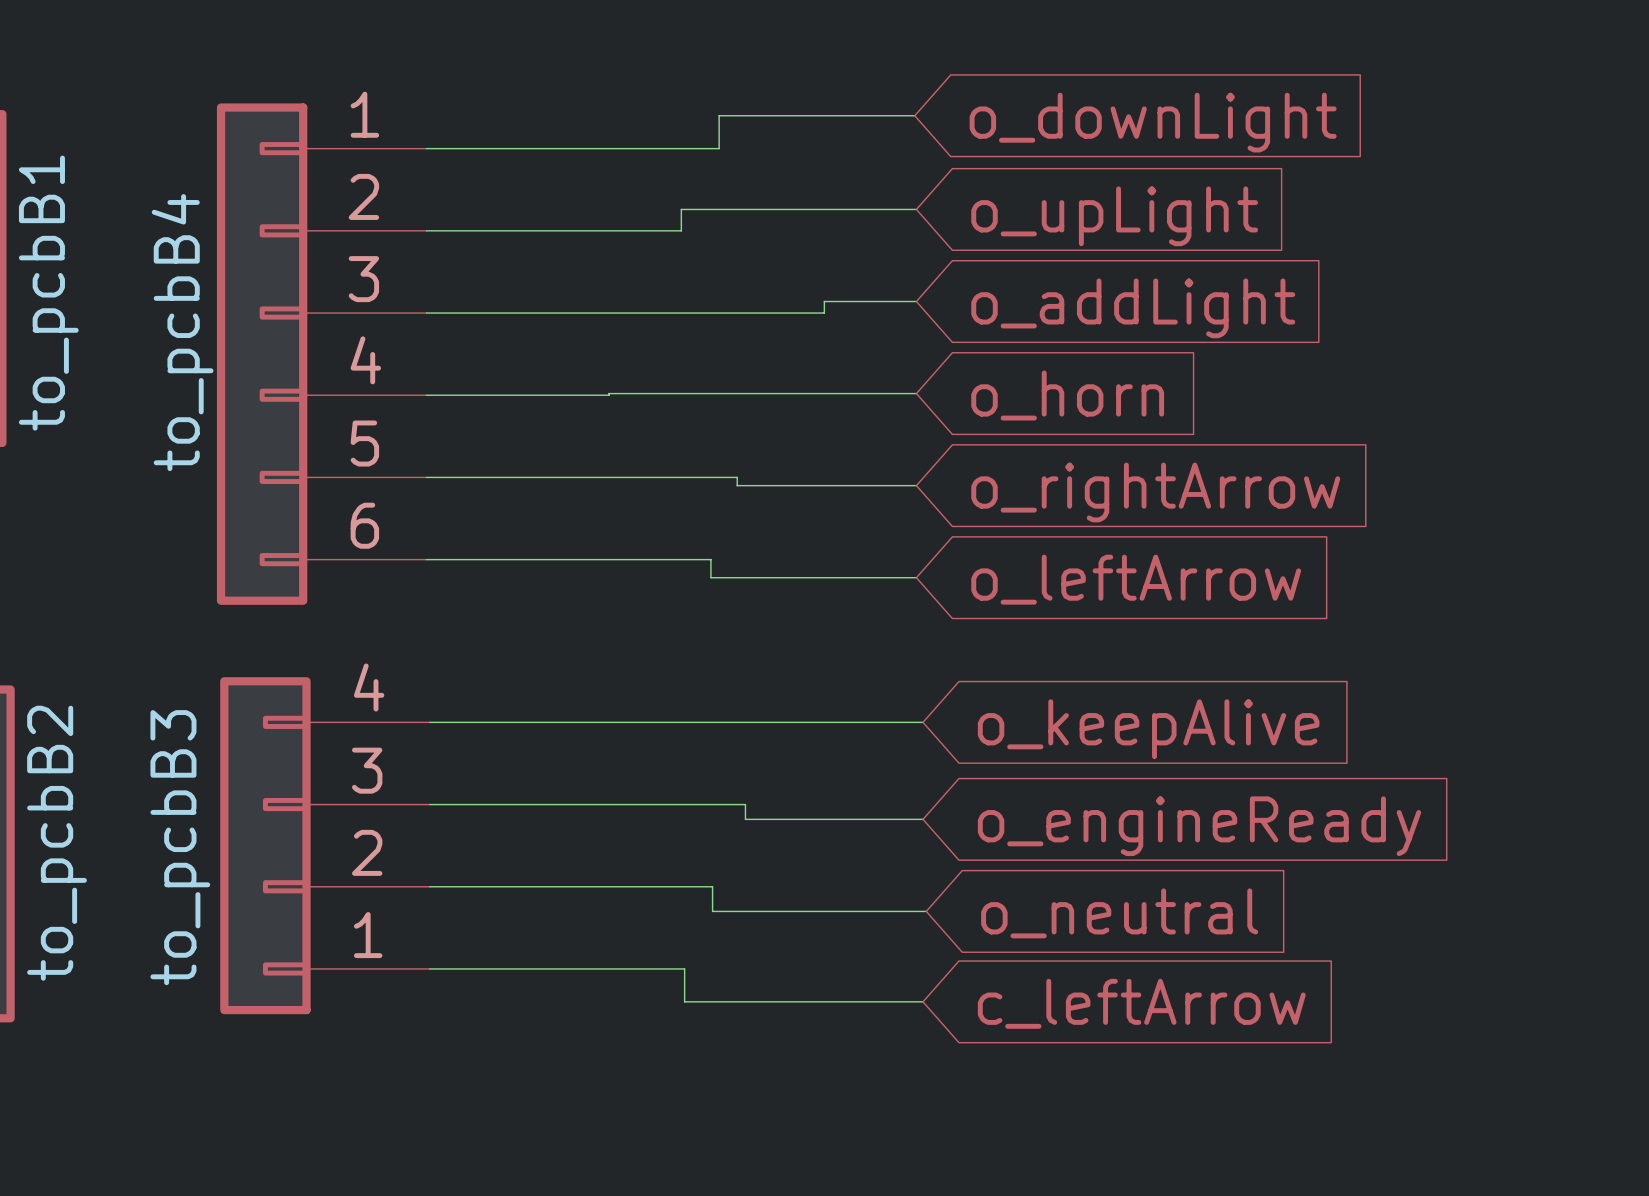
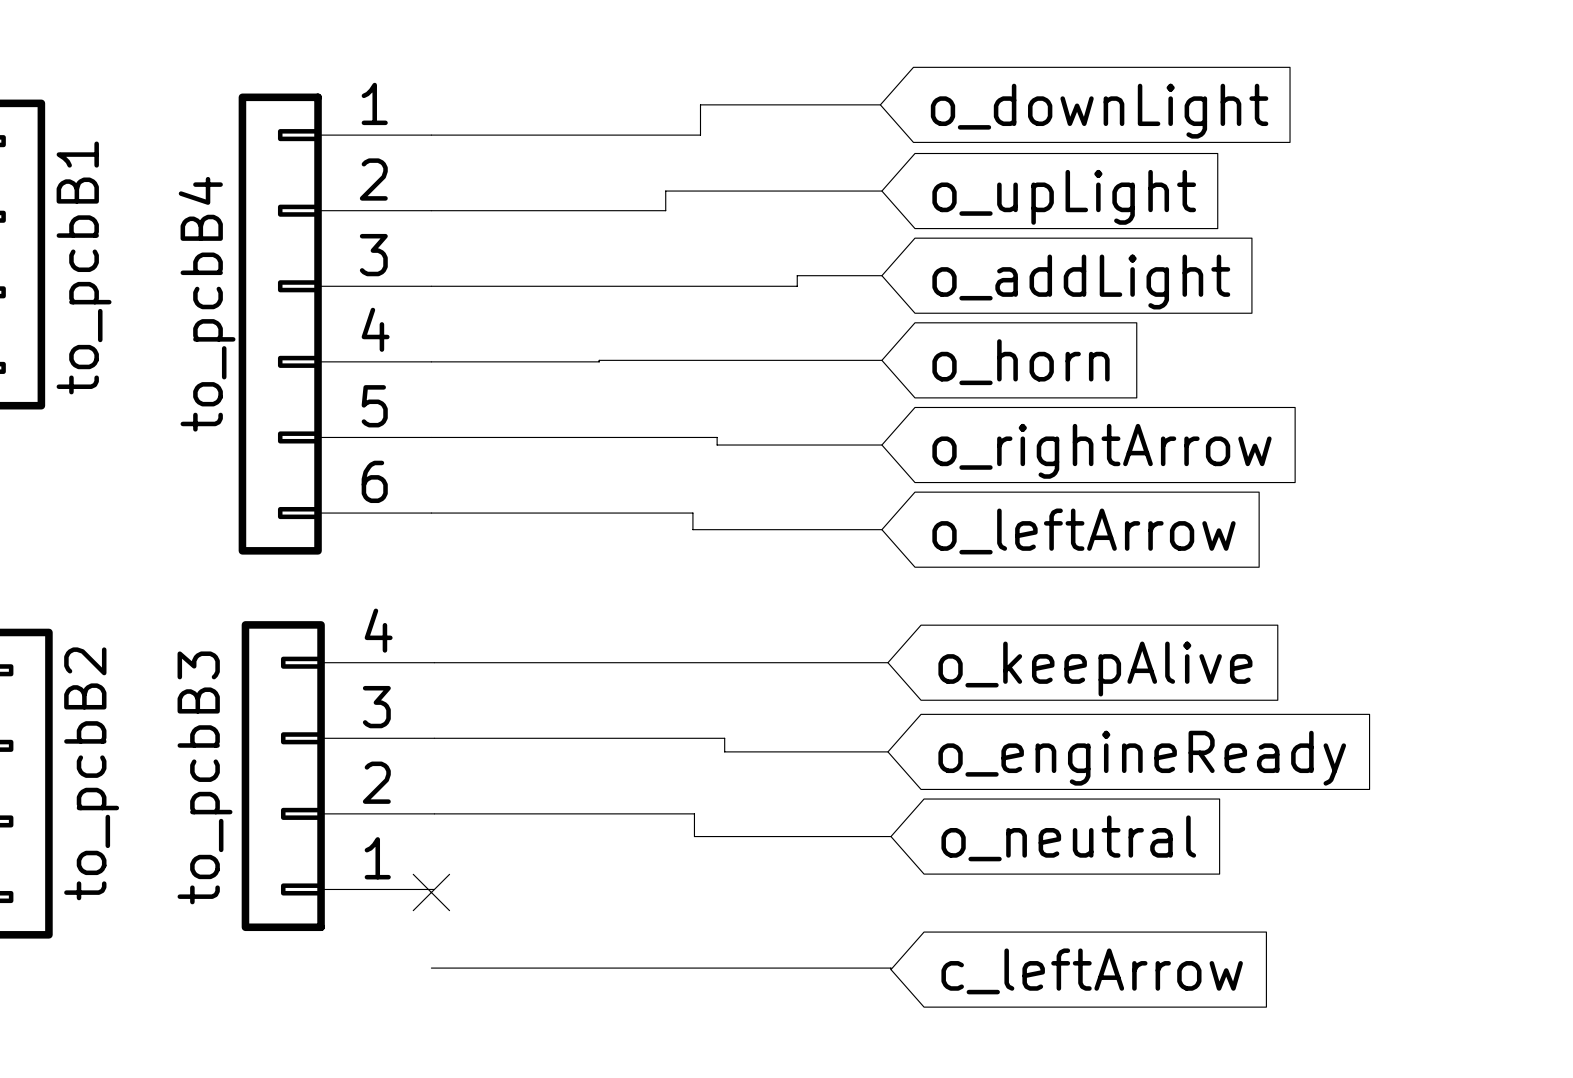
wire: (429, 968) (684, 968) (684, 1001) (923, 1001) -> none
no-connect mark: none -> (431, 892)
global label position: c_leftArrow (1141, 1003) -> c_leftArrow (1092, 971)
wire: none -> (431, 968) (890, 968) (890, 969)

